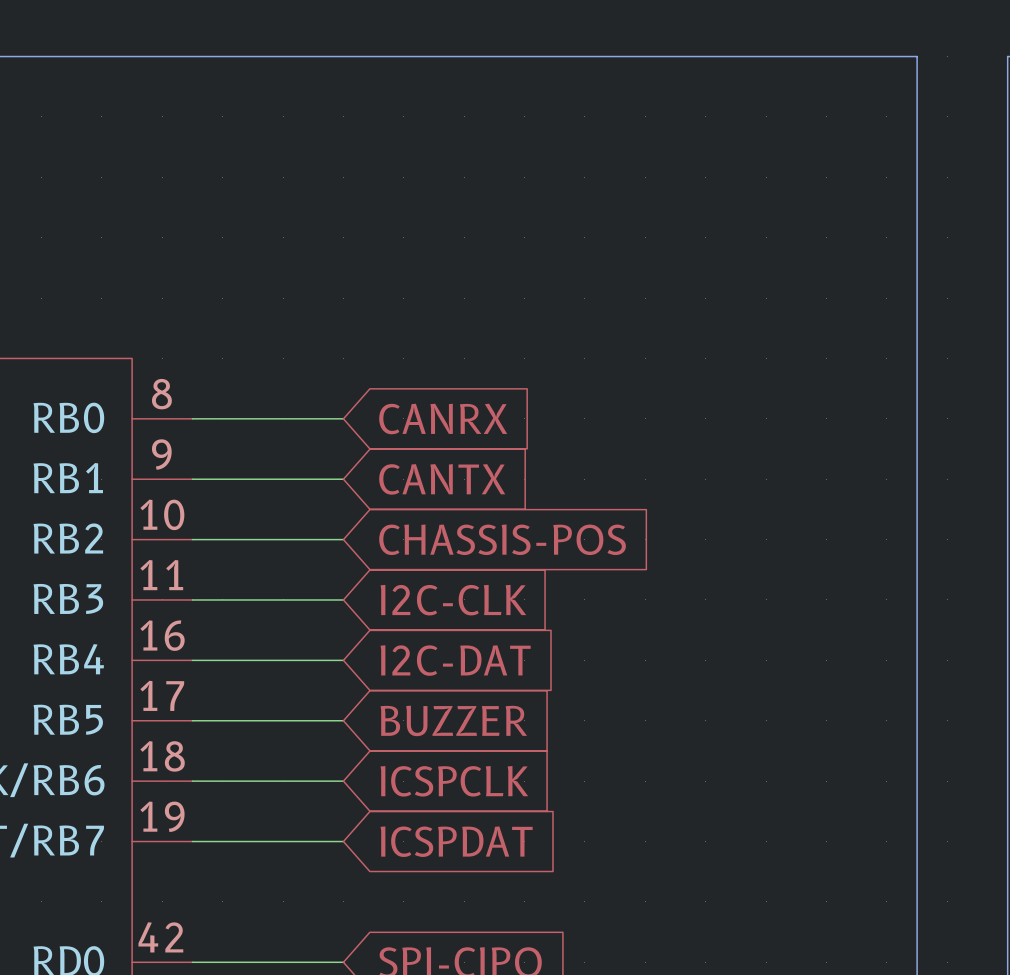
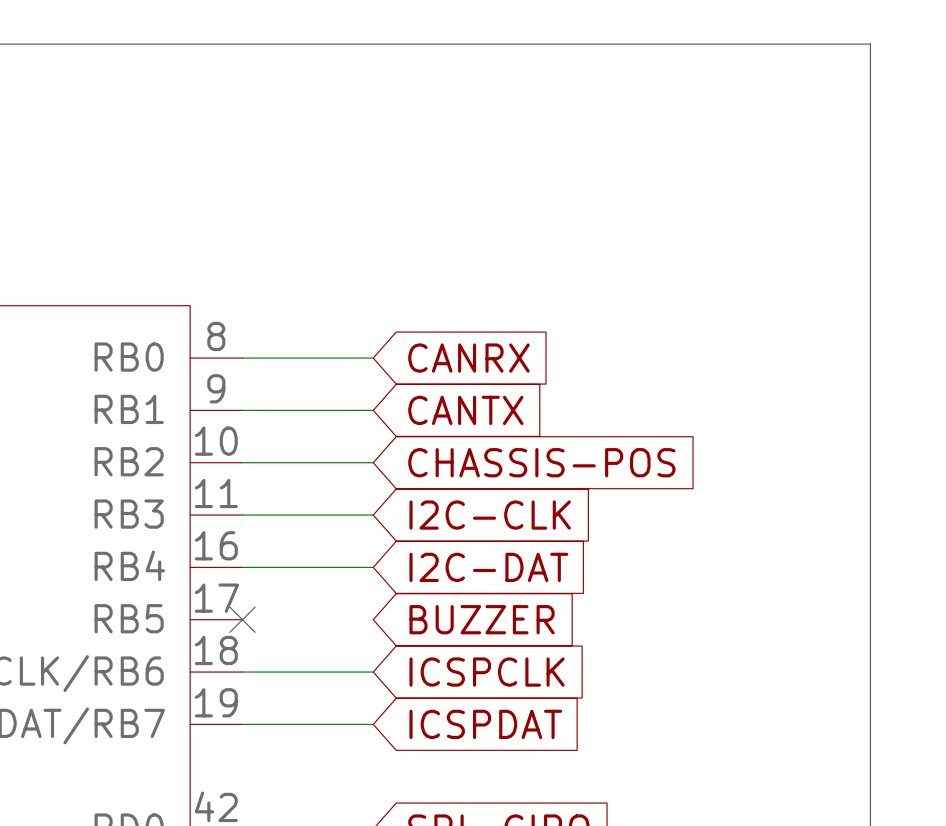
wire: (192, 720) (343, 720) -> none
no-connect mark: none -> (242, 619)

